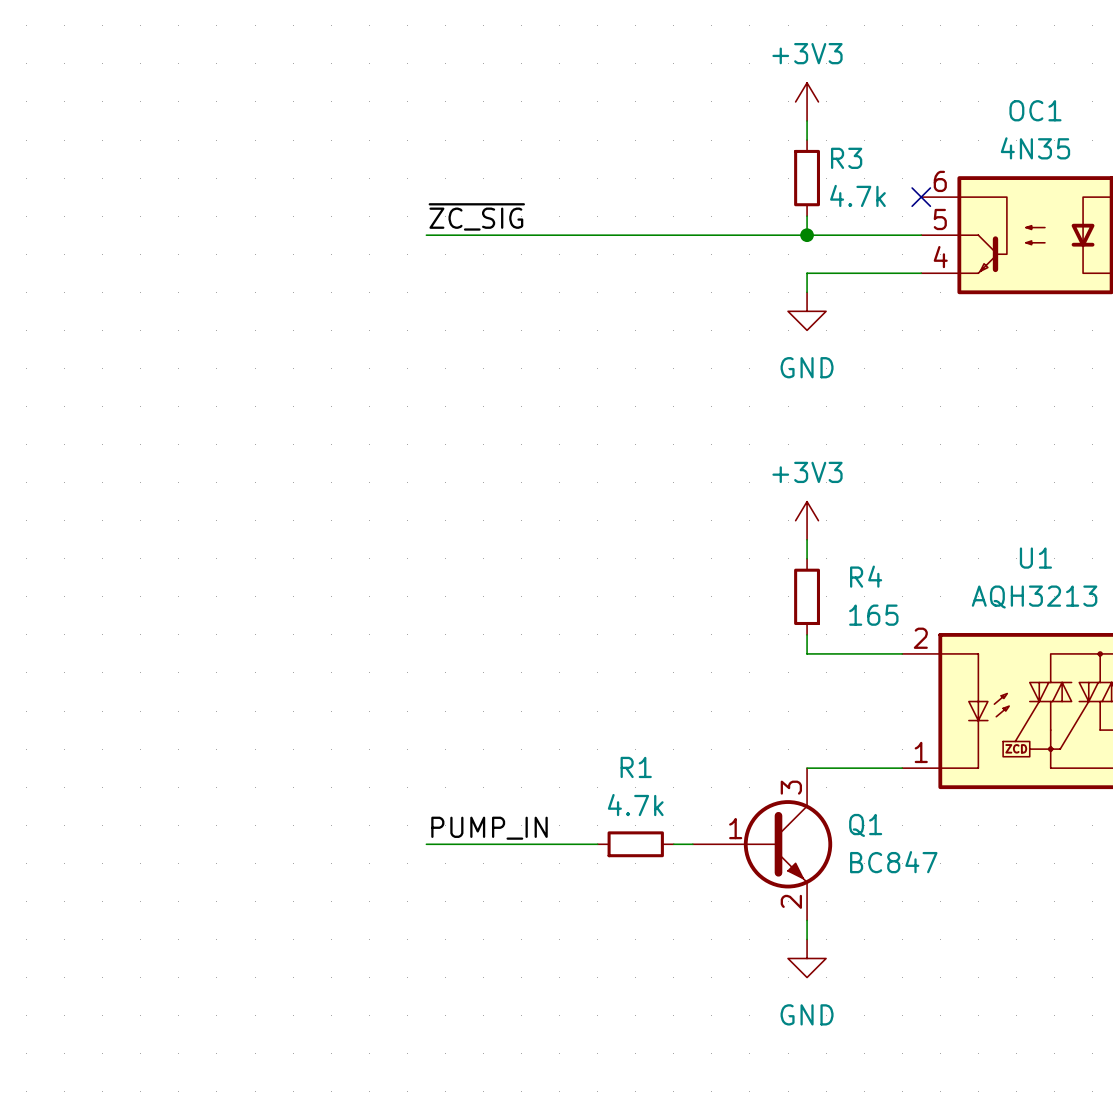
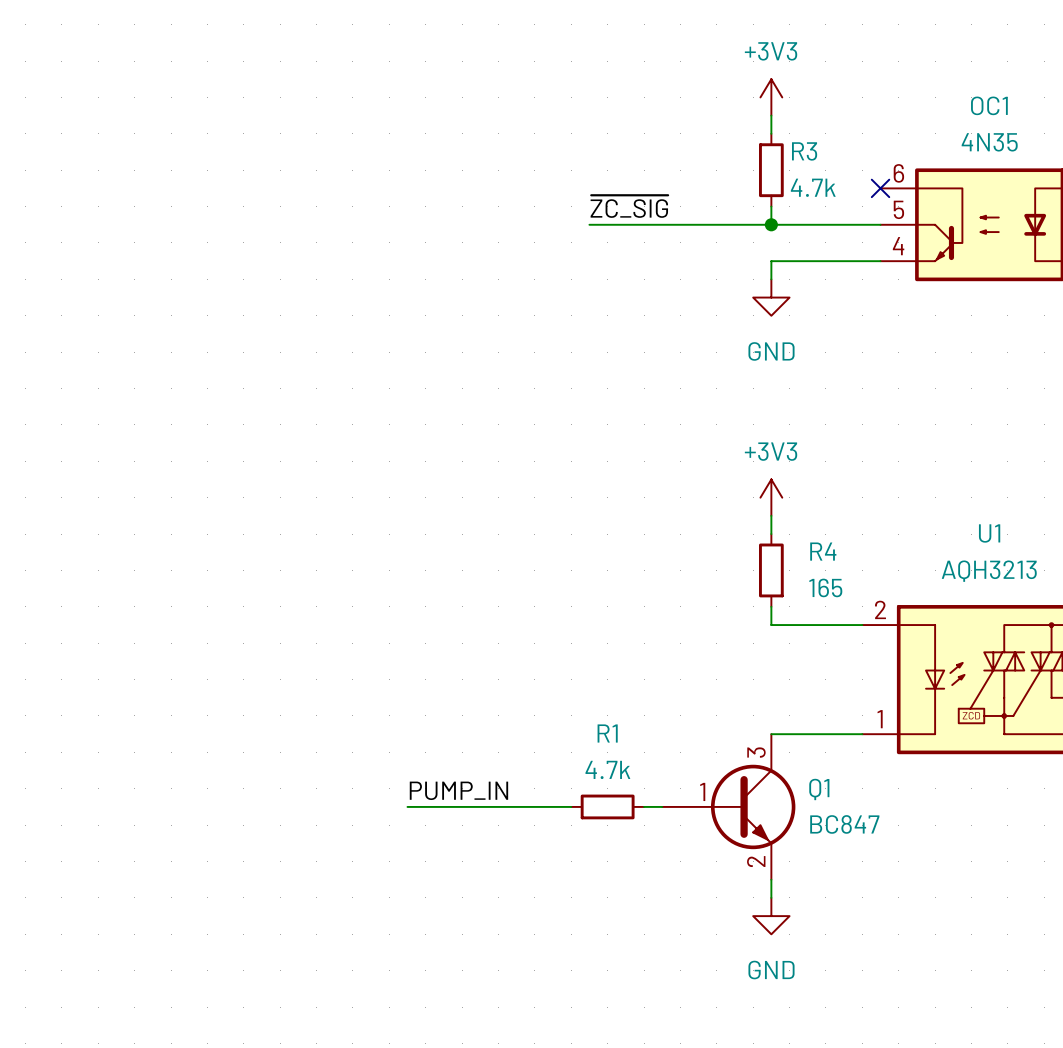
label position: ~{ZC_SIG} (476, 216) -> ~{ZC_SIG} (629, 206)
wire: (426, 235) (616, 235) -> none

